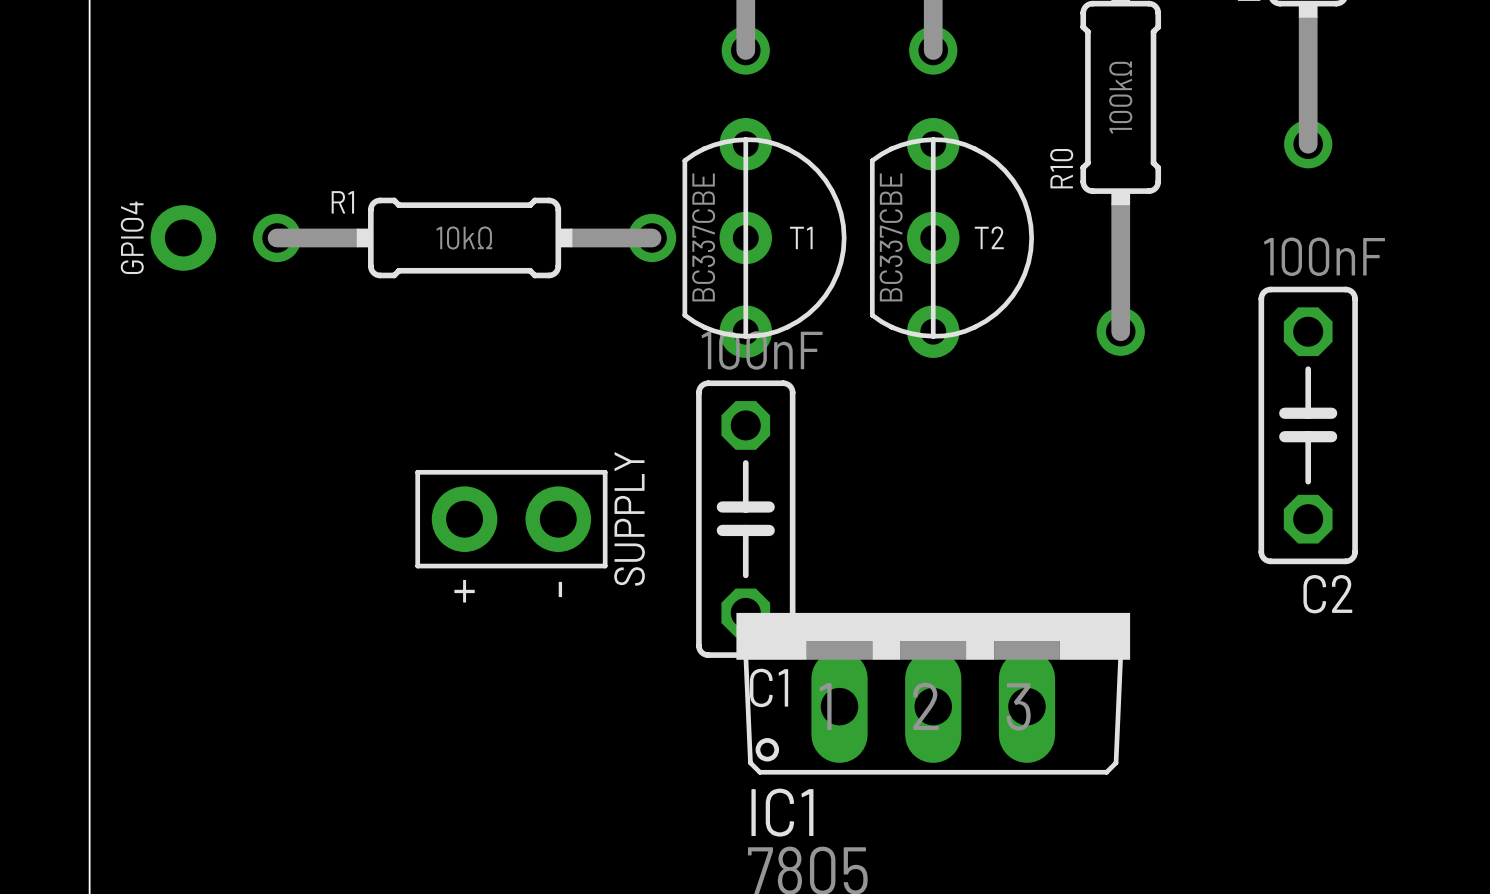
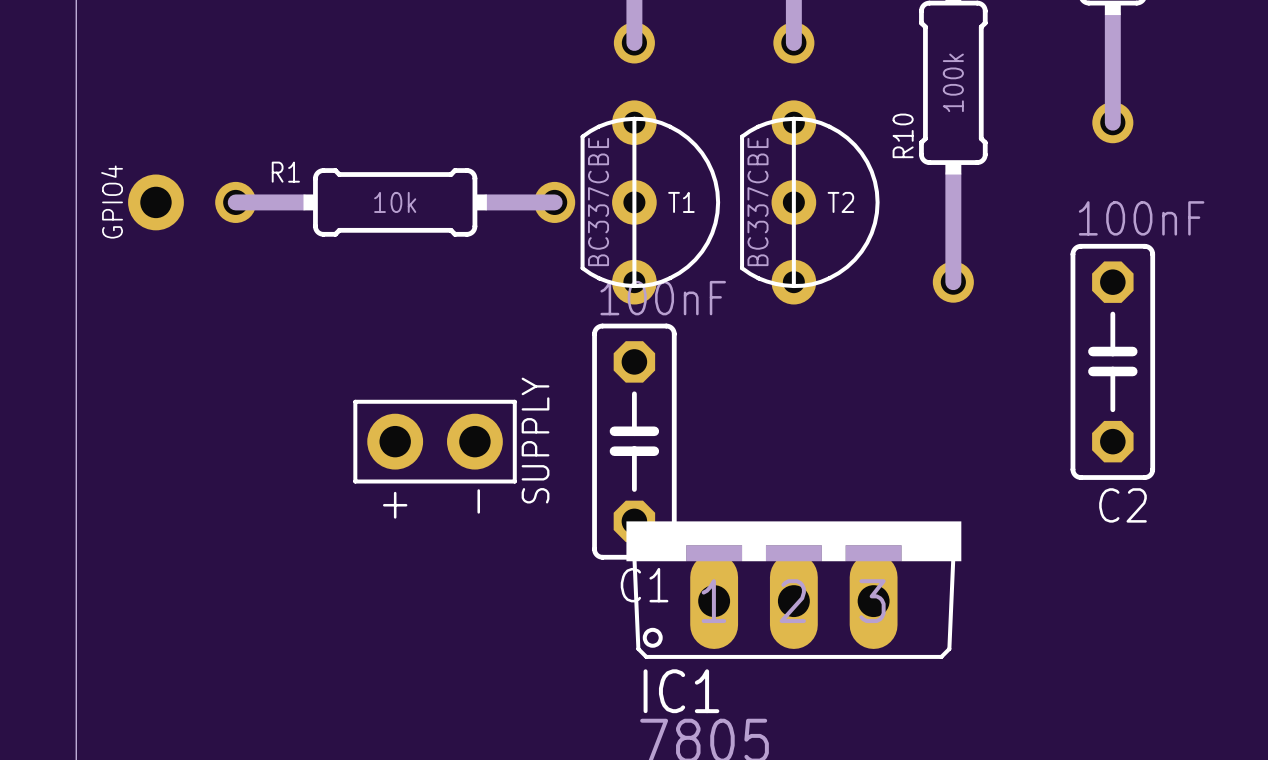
R10 value: 100kΩ (1120, 97) -> 100k (953, 82)
R1 value: 10kΩ (464, 237) -> 10k (395, 202)

